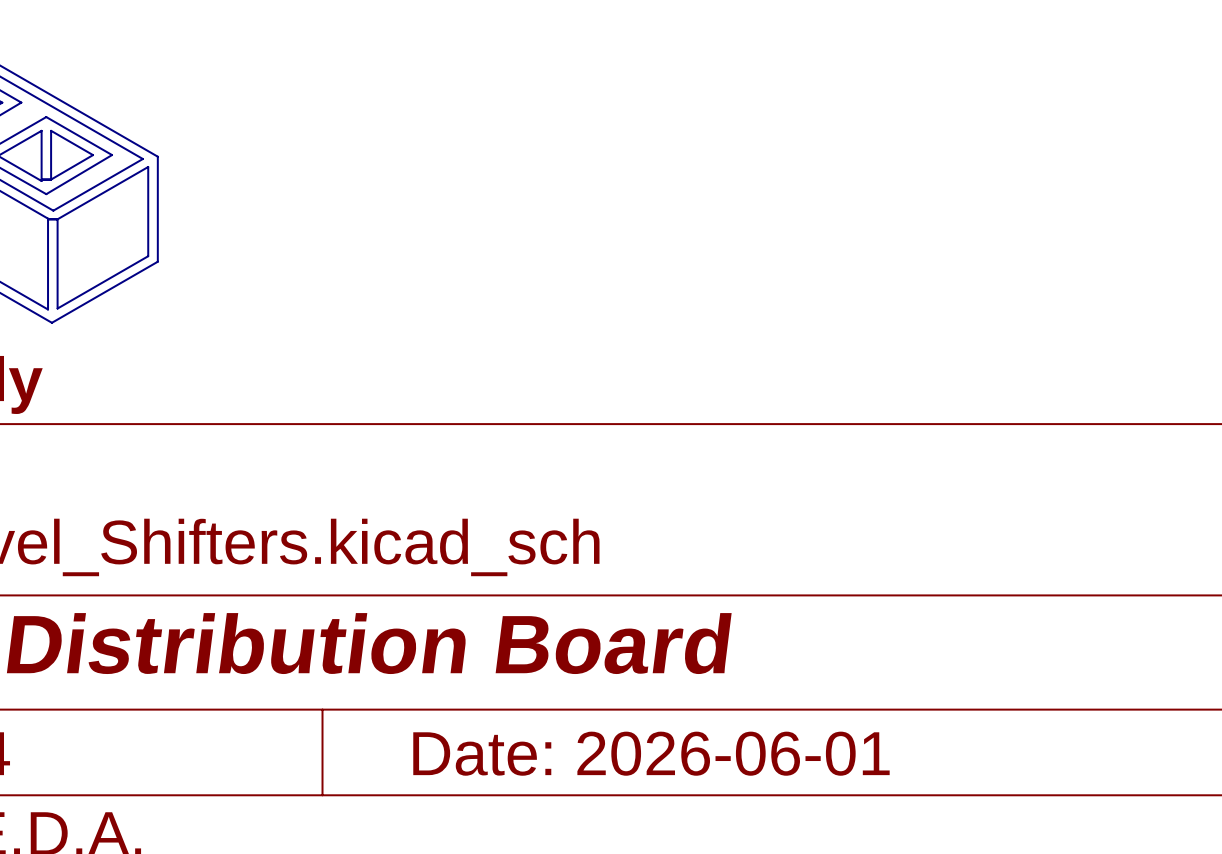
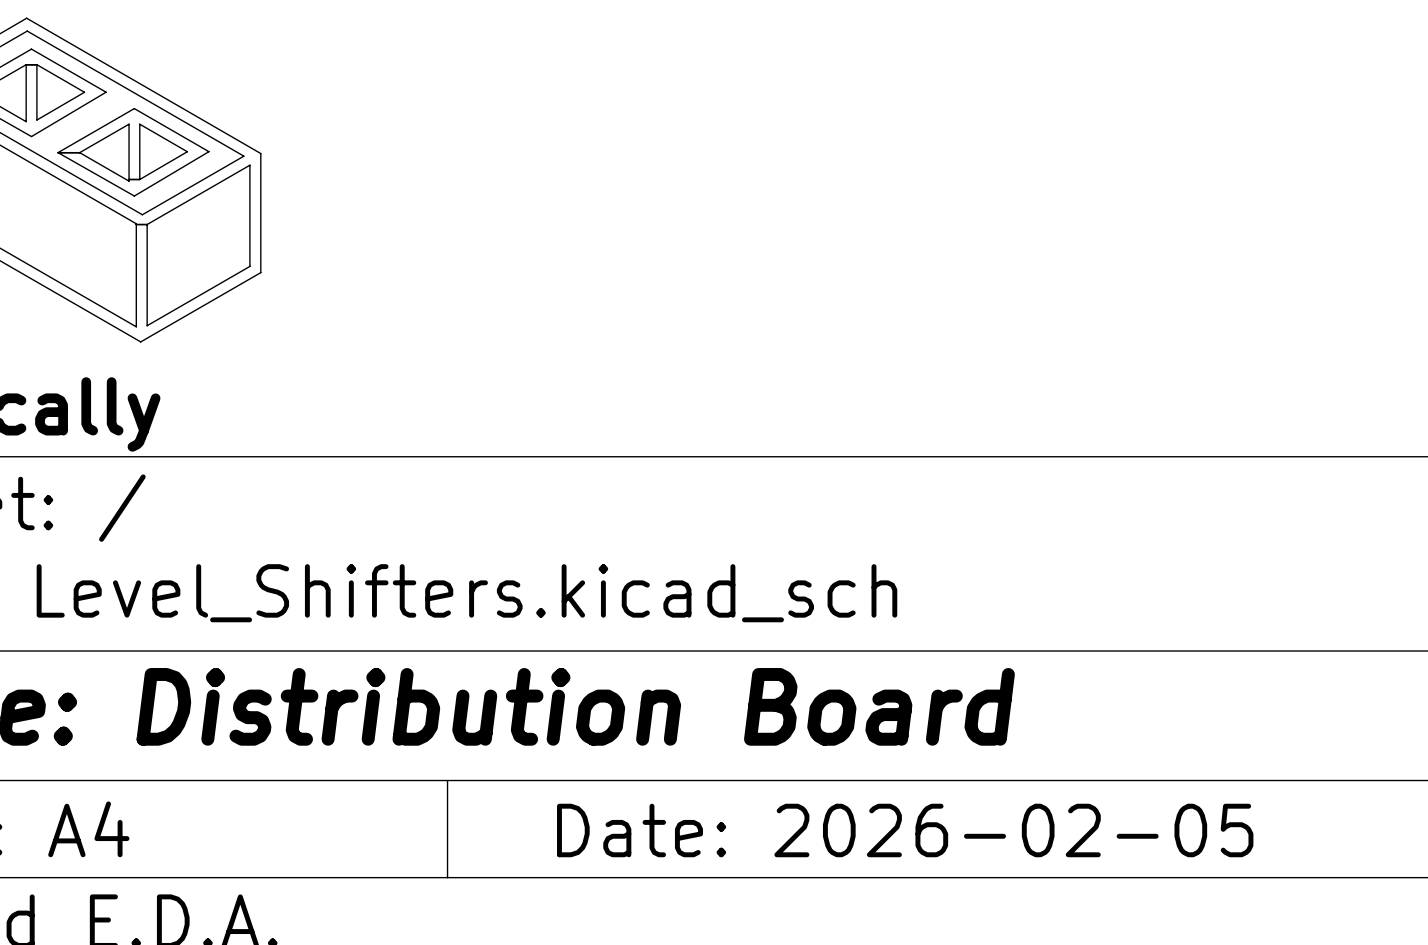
title block: Date: 2026-06-01 (651, 753) -> Date: 2026-02-05 (905, 830)

